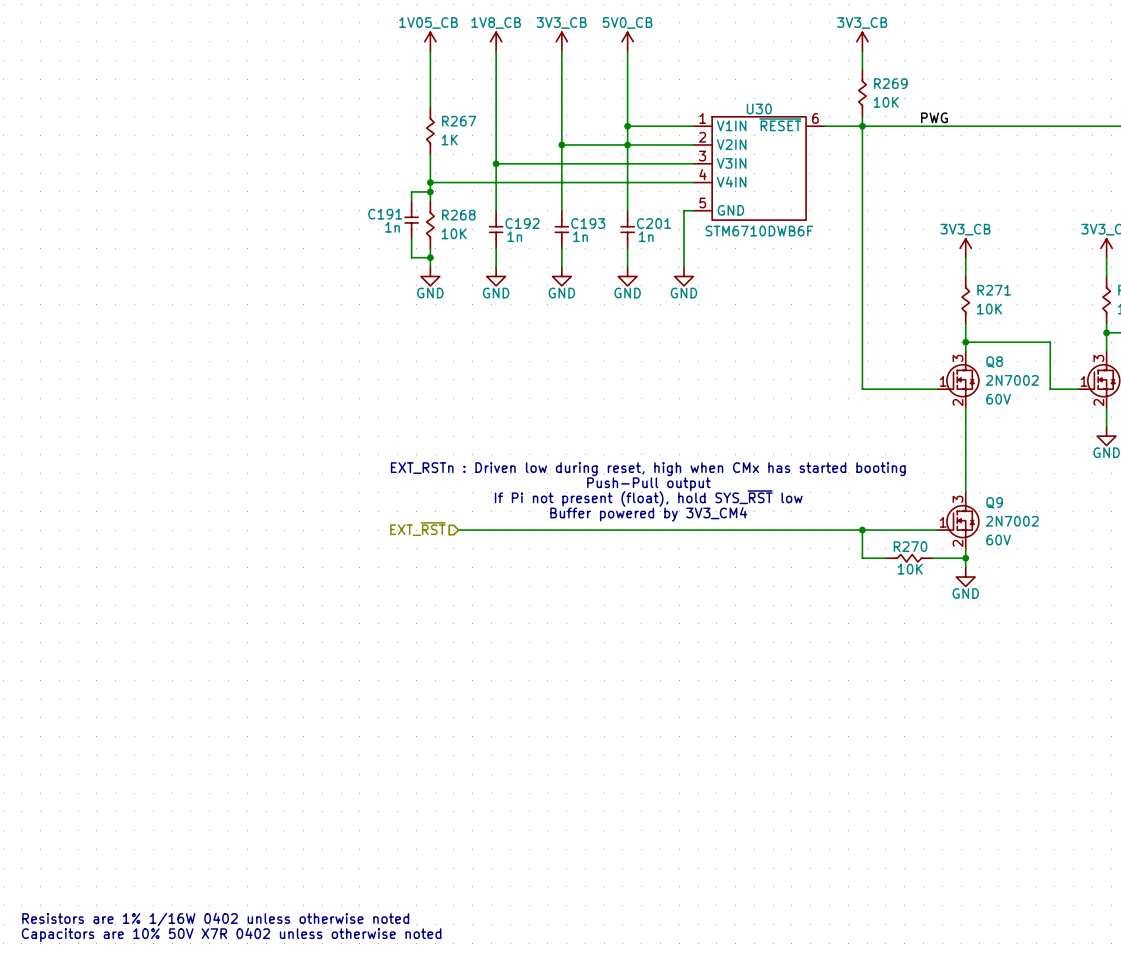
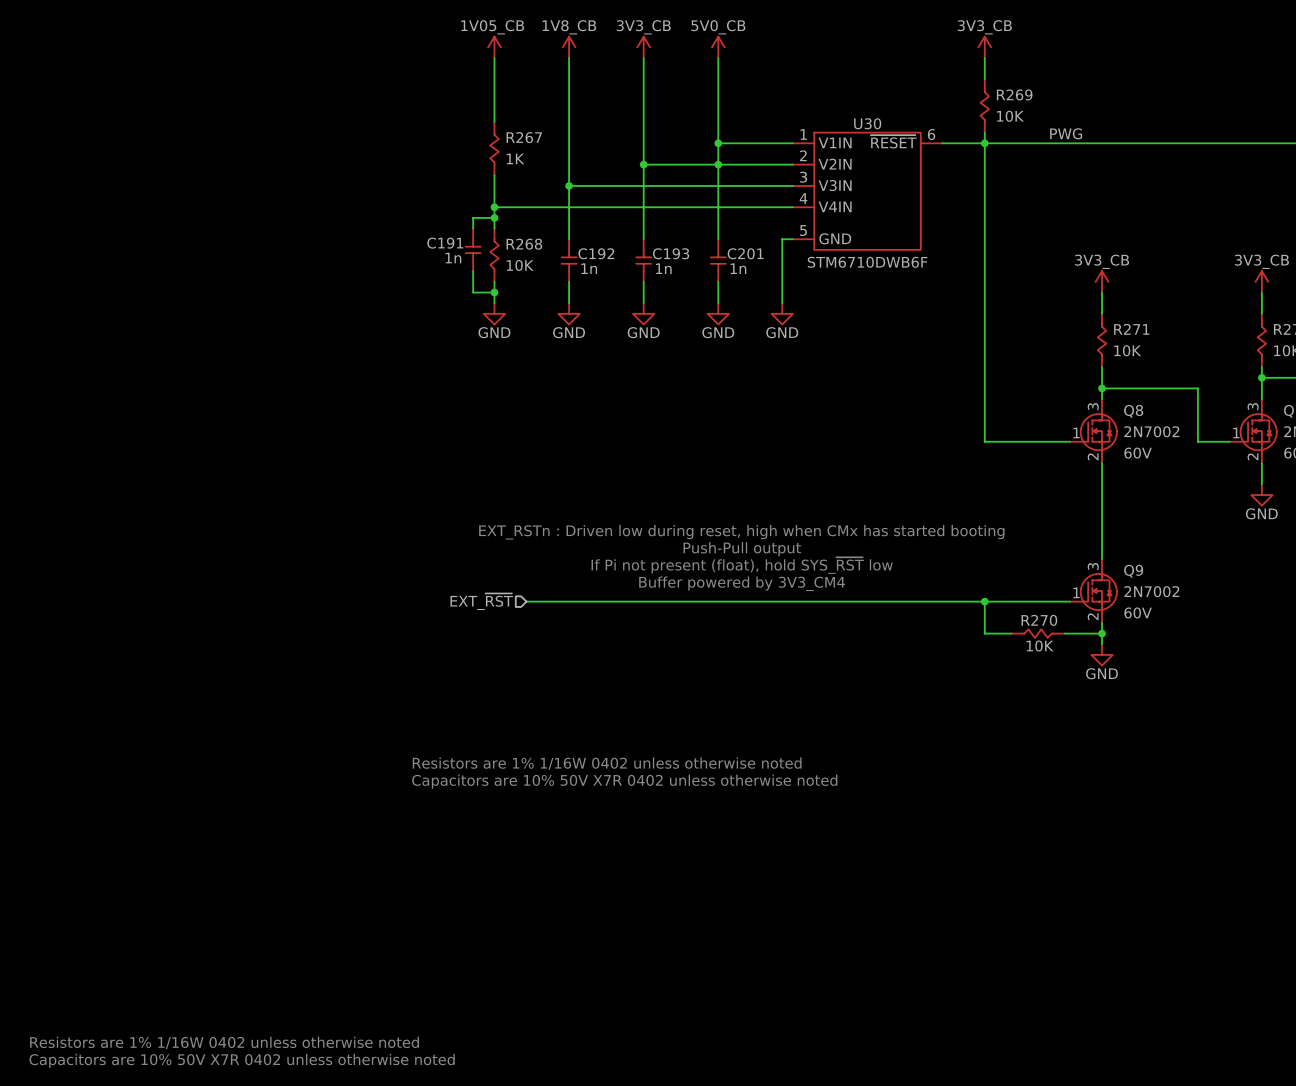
text: none -> Resistors are 1% 1/16W 0402 unless otherwise noted (607, 763)
text: none -> Capacitors are 10% 50V X7R 0402 unless otherwise noted (624, 781)

